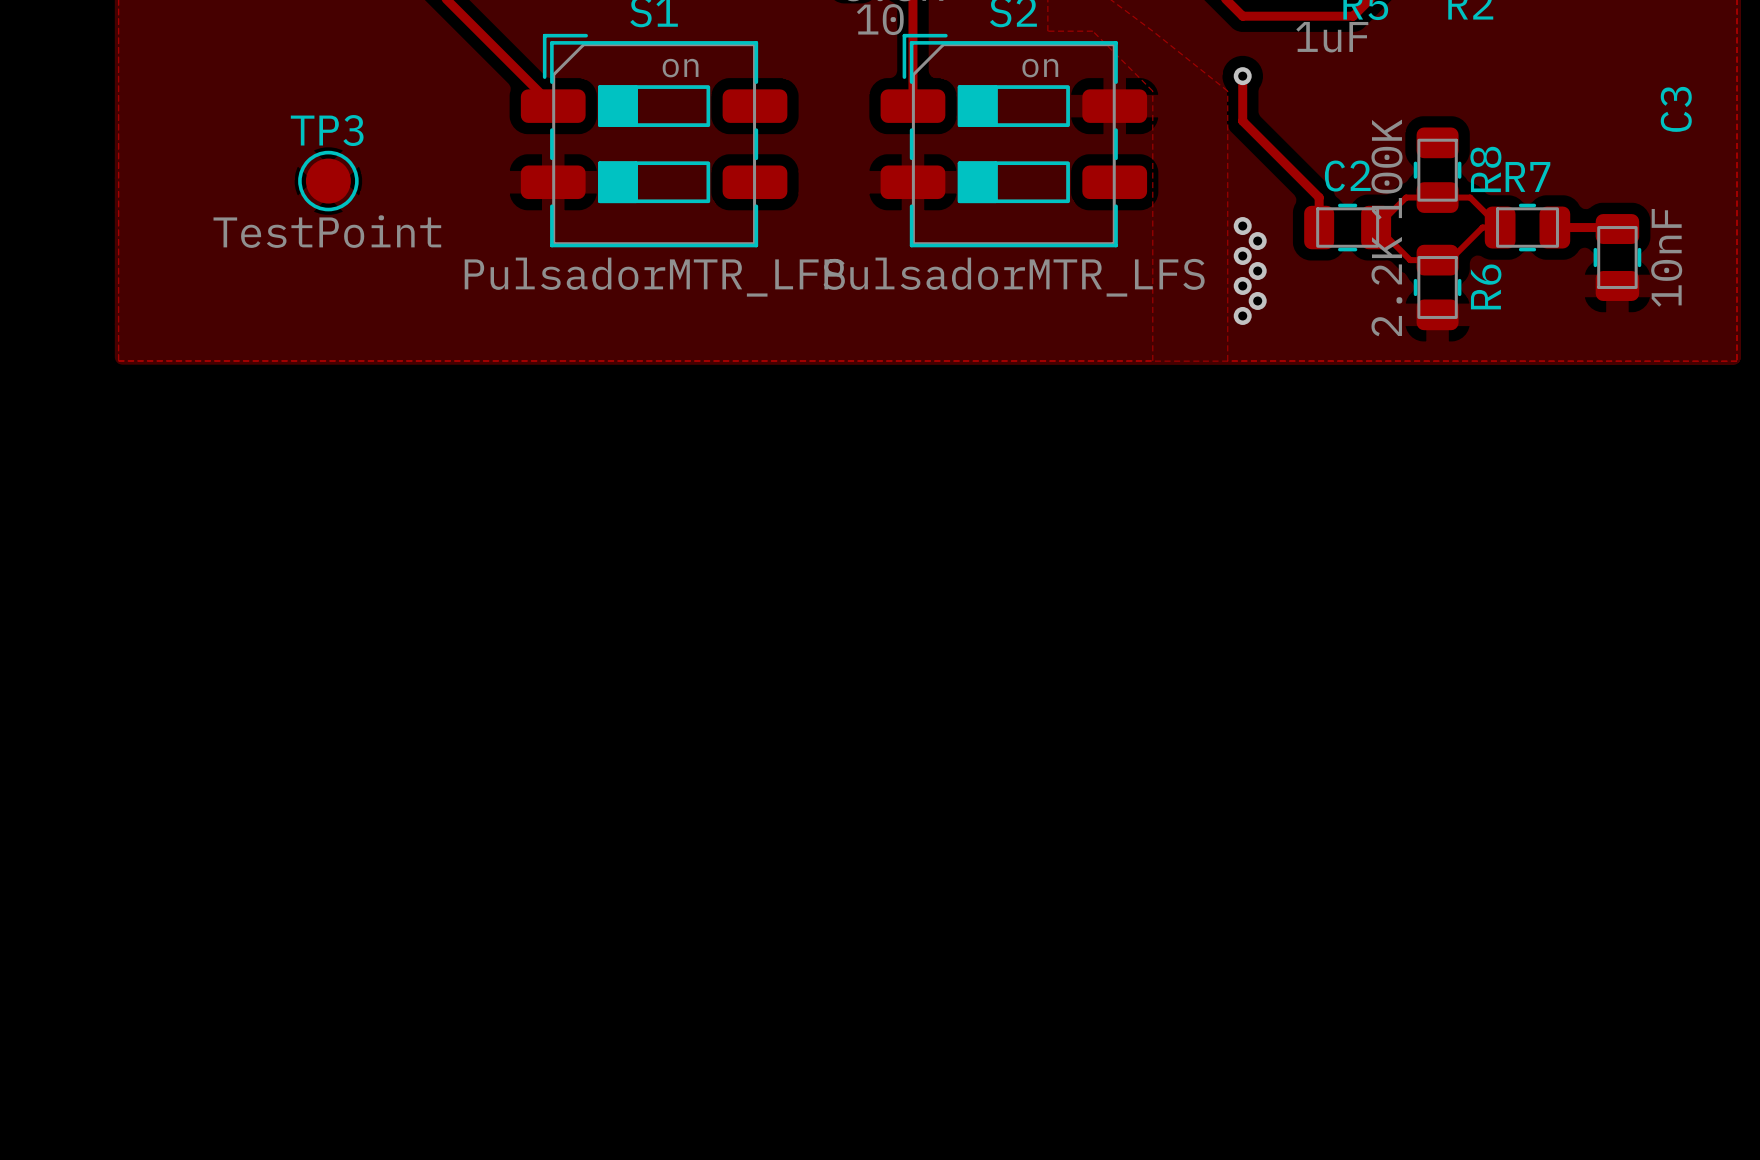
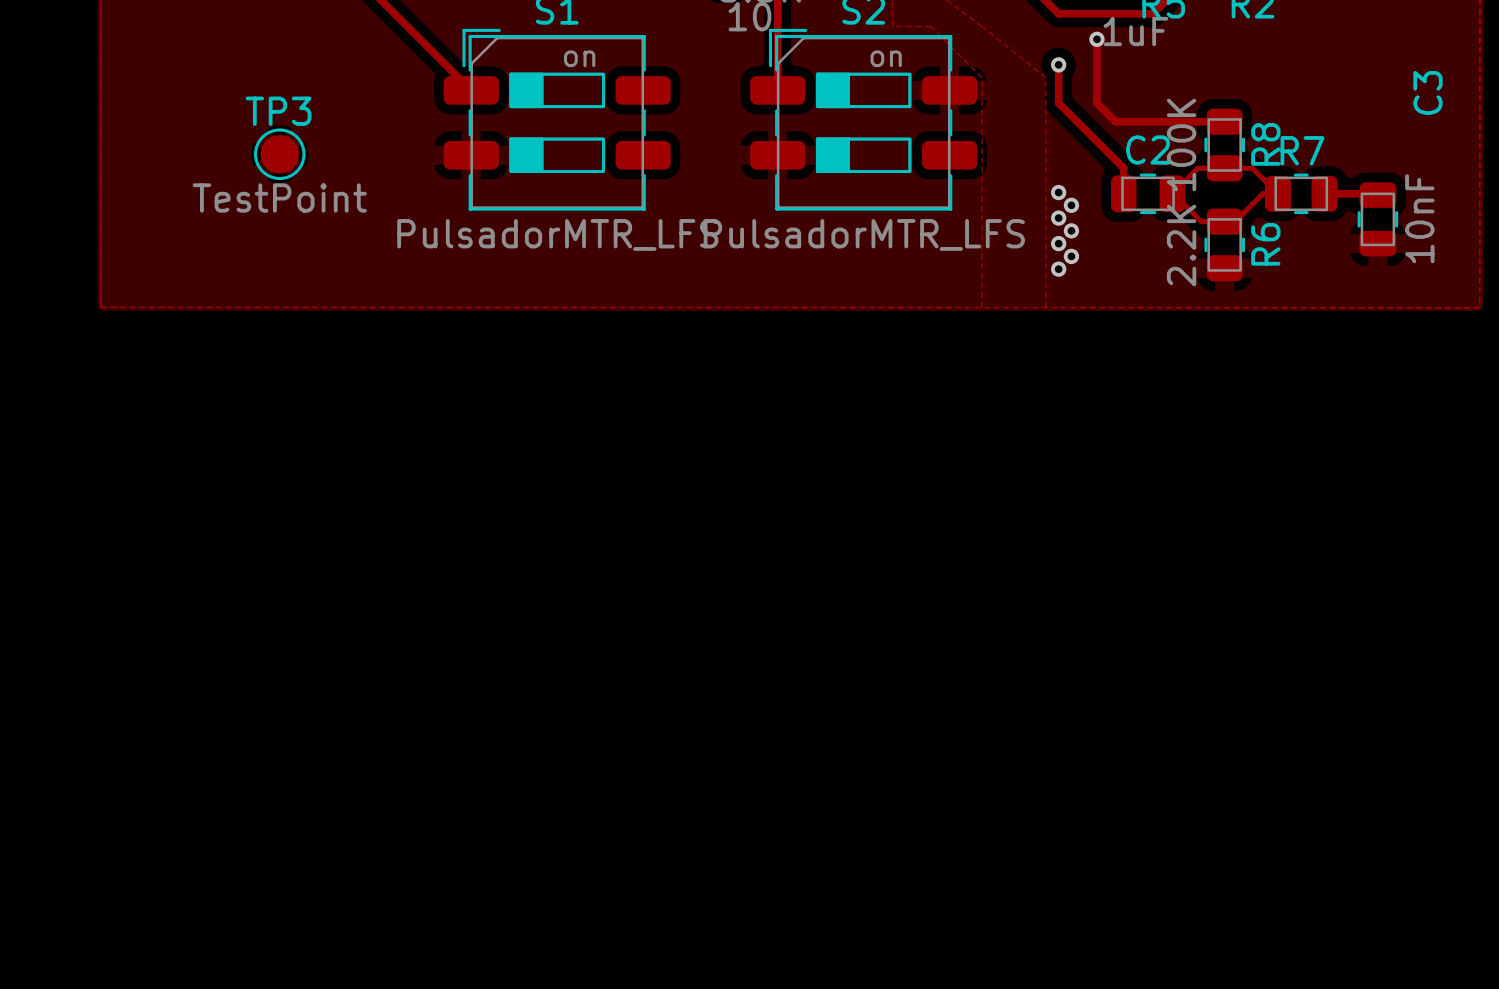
track: none -> (1096, 39) (1096, 103) (1115, 121) (1224, 121)
via: none -> (1096, 39)

